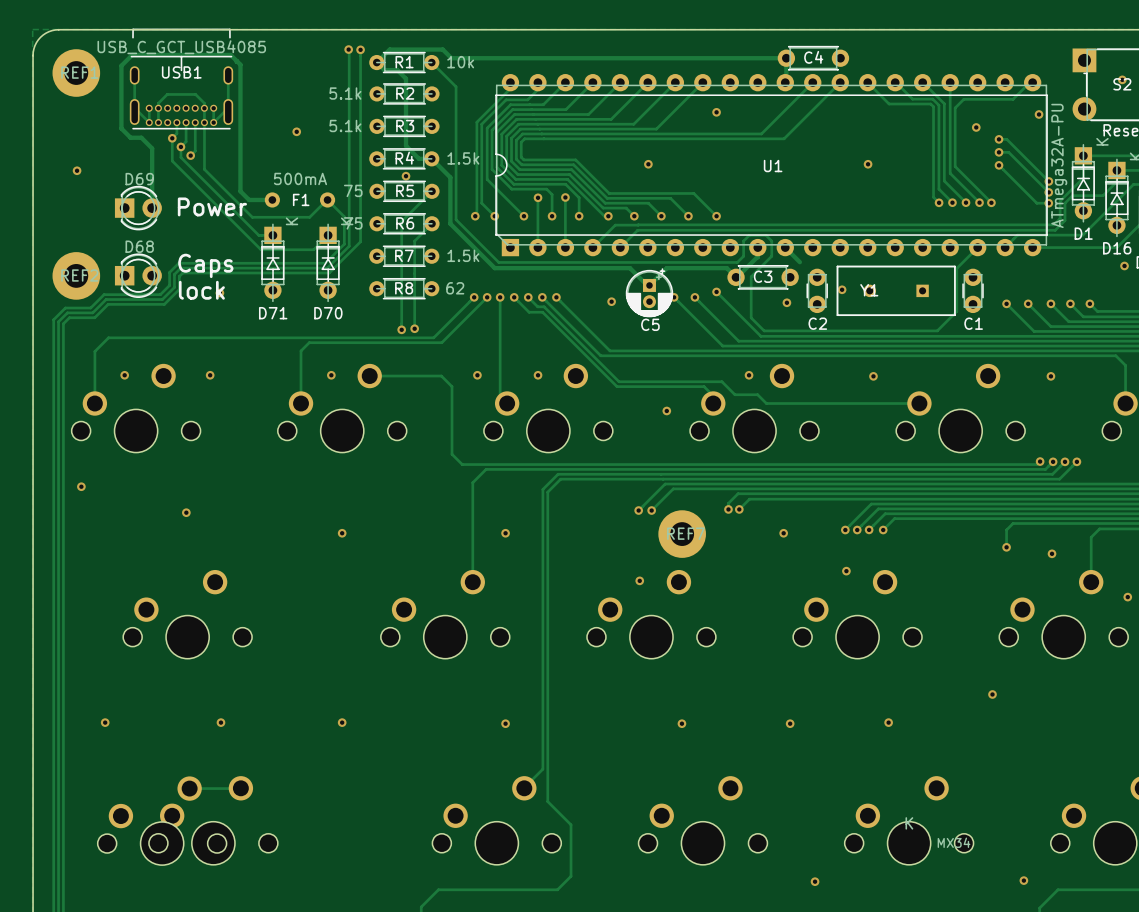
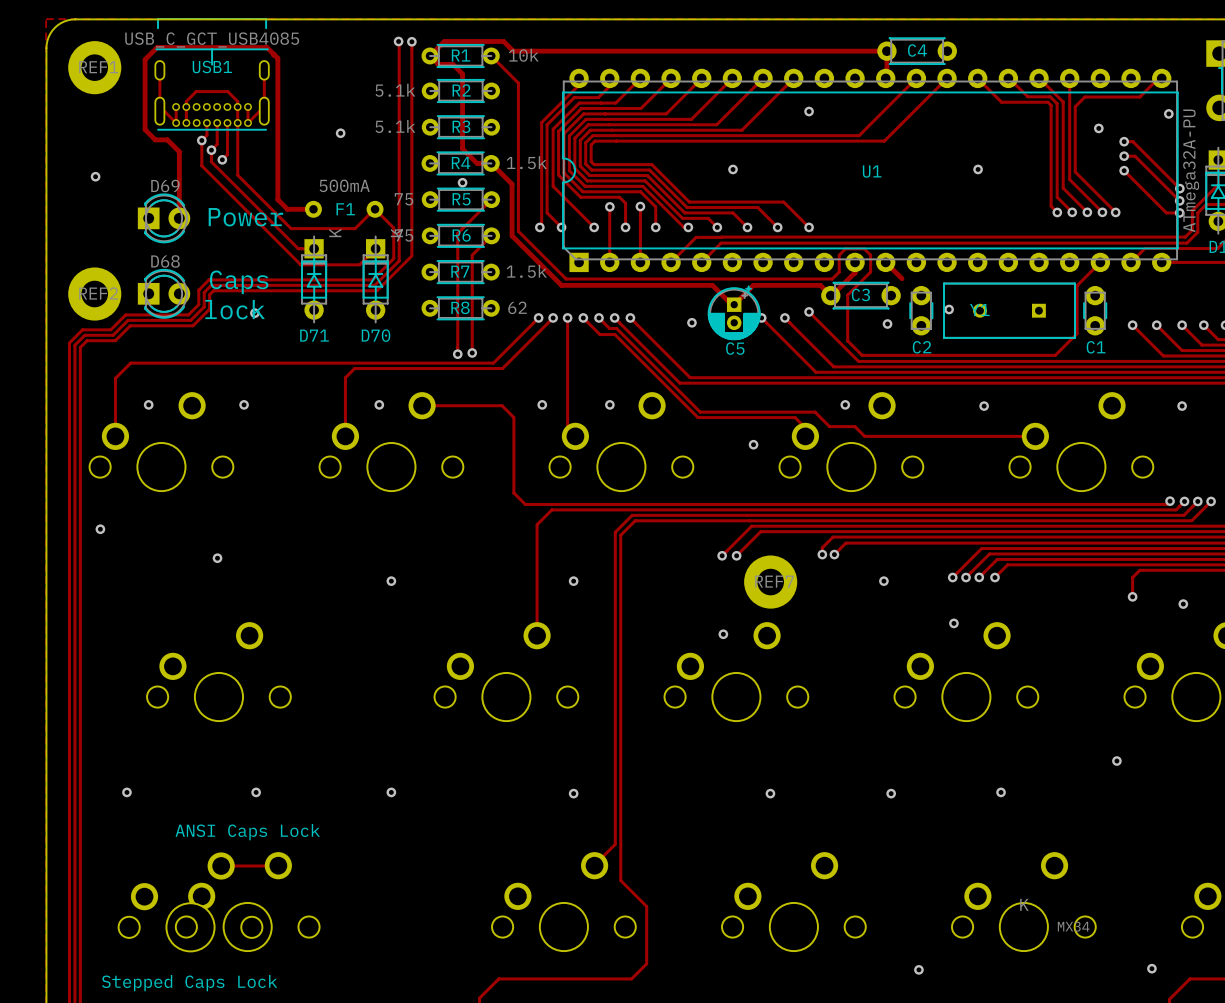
part value: none -> ANSI Caps Lock (247, 832)
part value: none -> Stepped Caps Lock (189, 983)

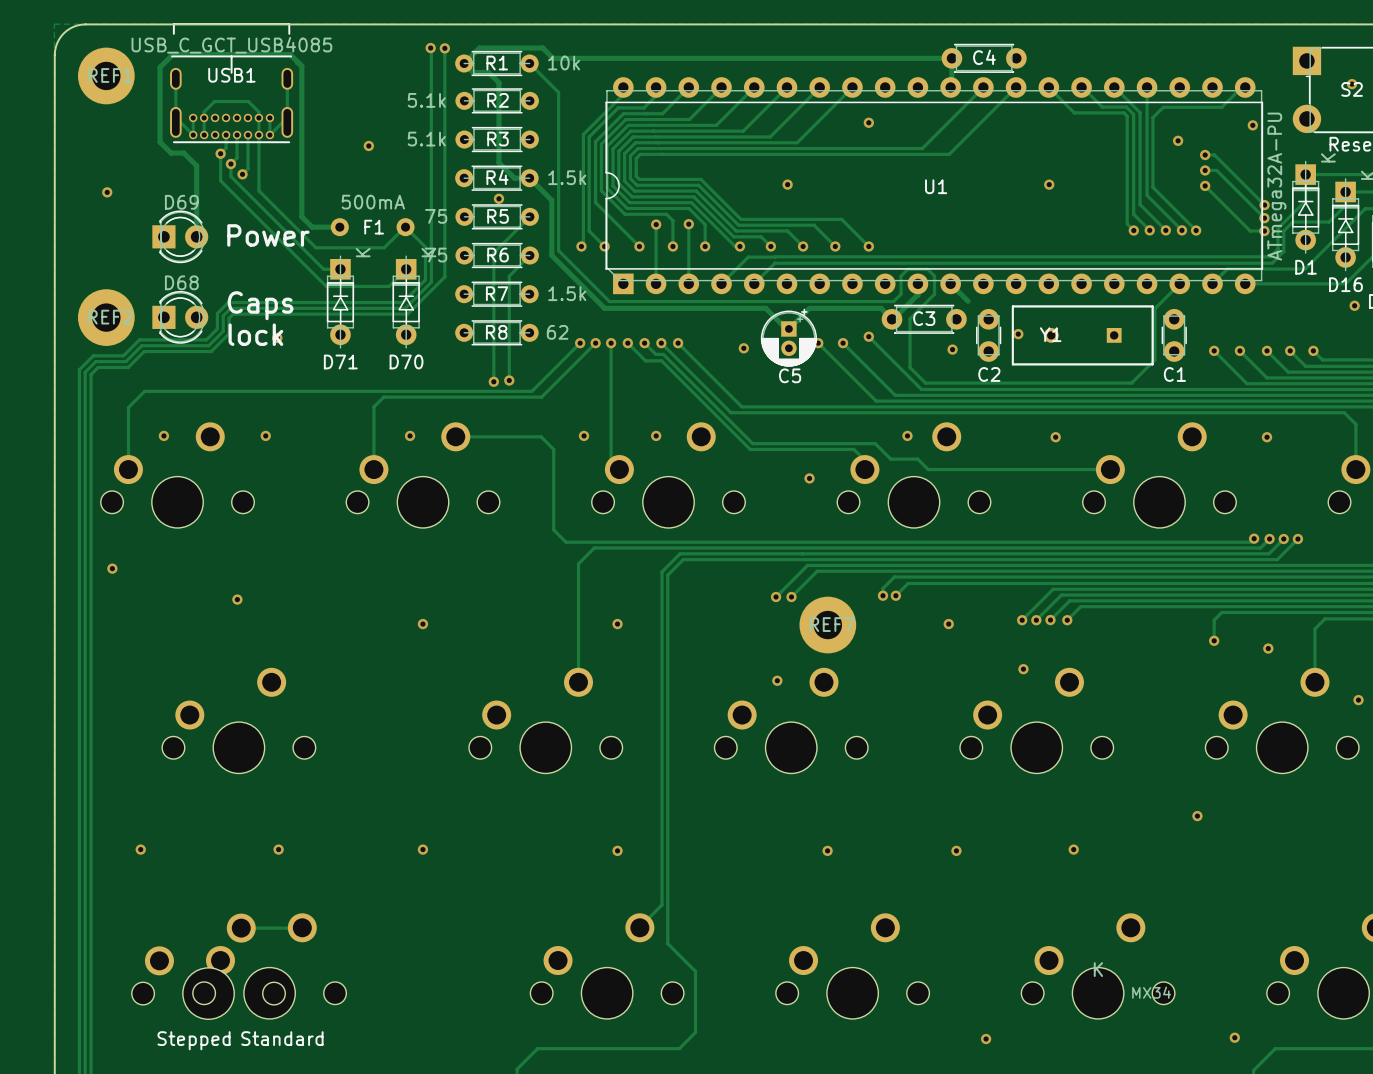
part value: ANSI Caps Lock (247, 832) -> Standard (282, 1038)
part value: Stepped Caps Lock (189, 983) -> Stepped (194, 1040)

